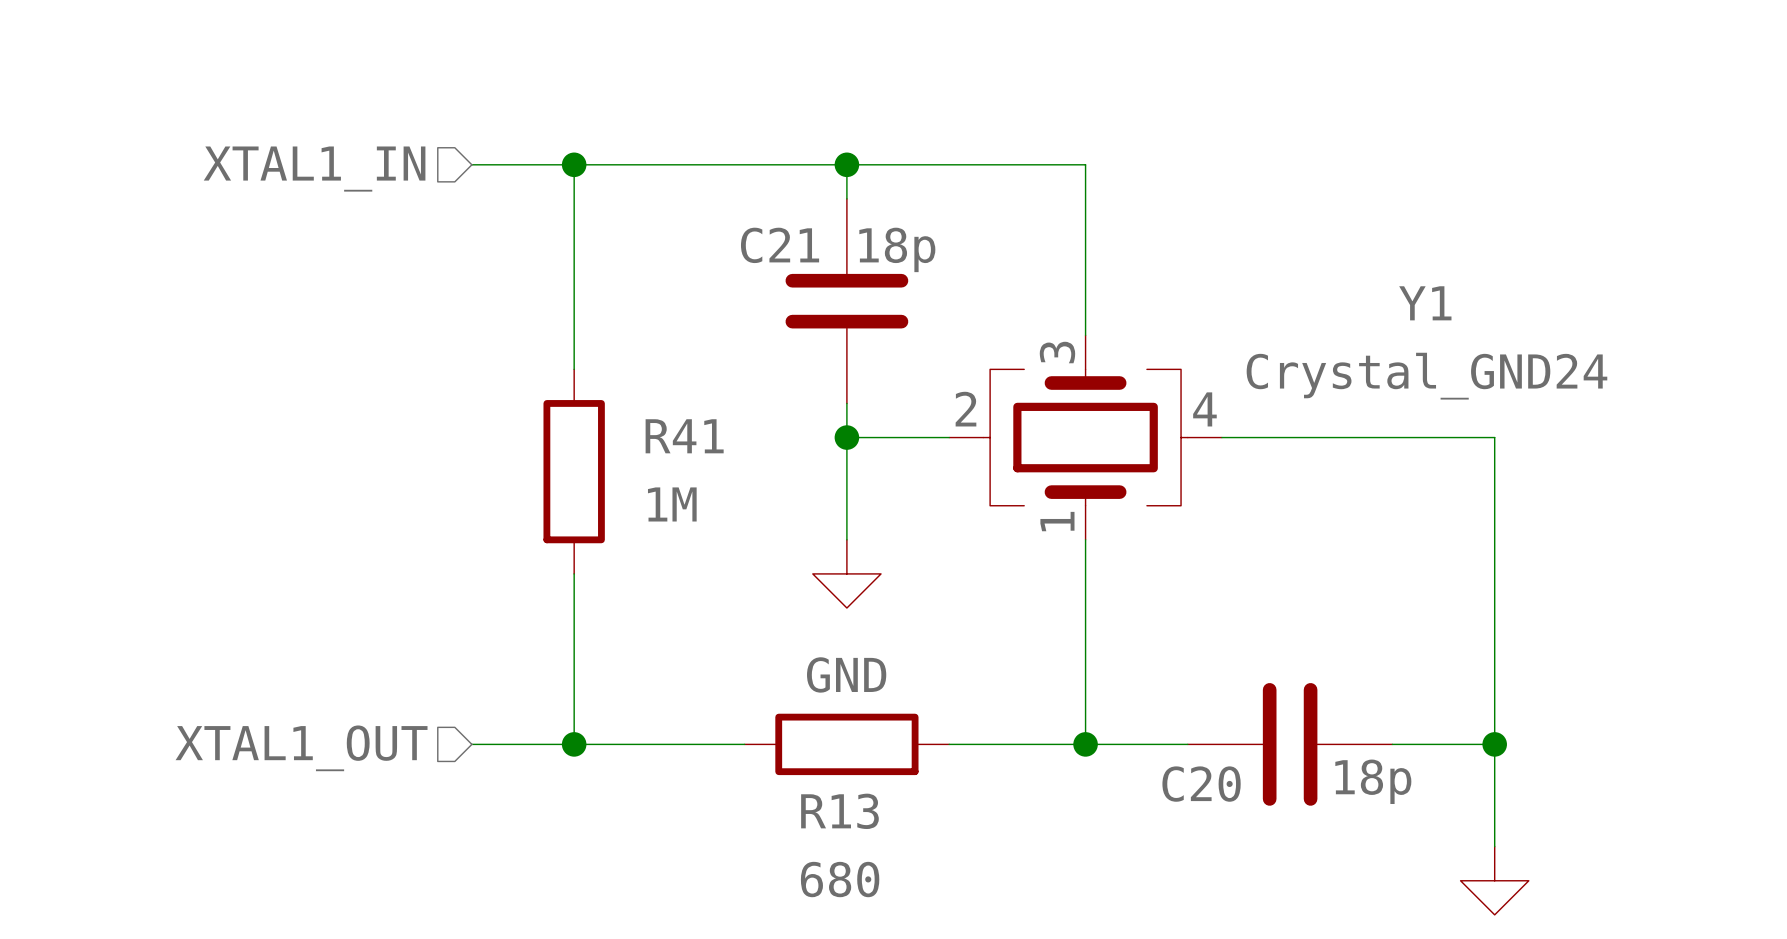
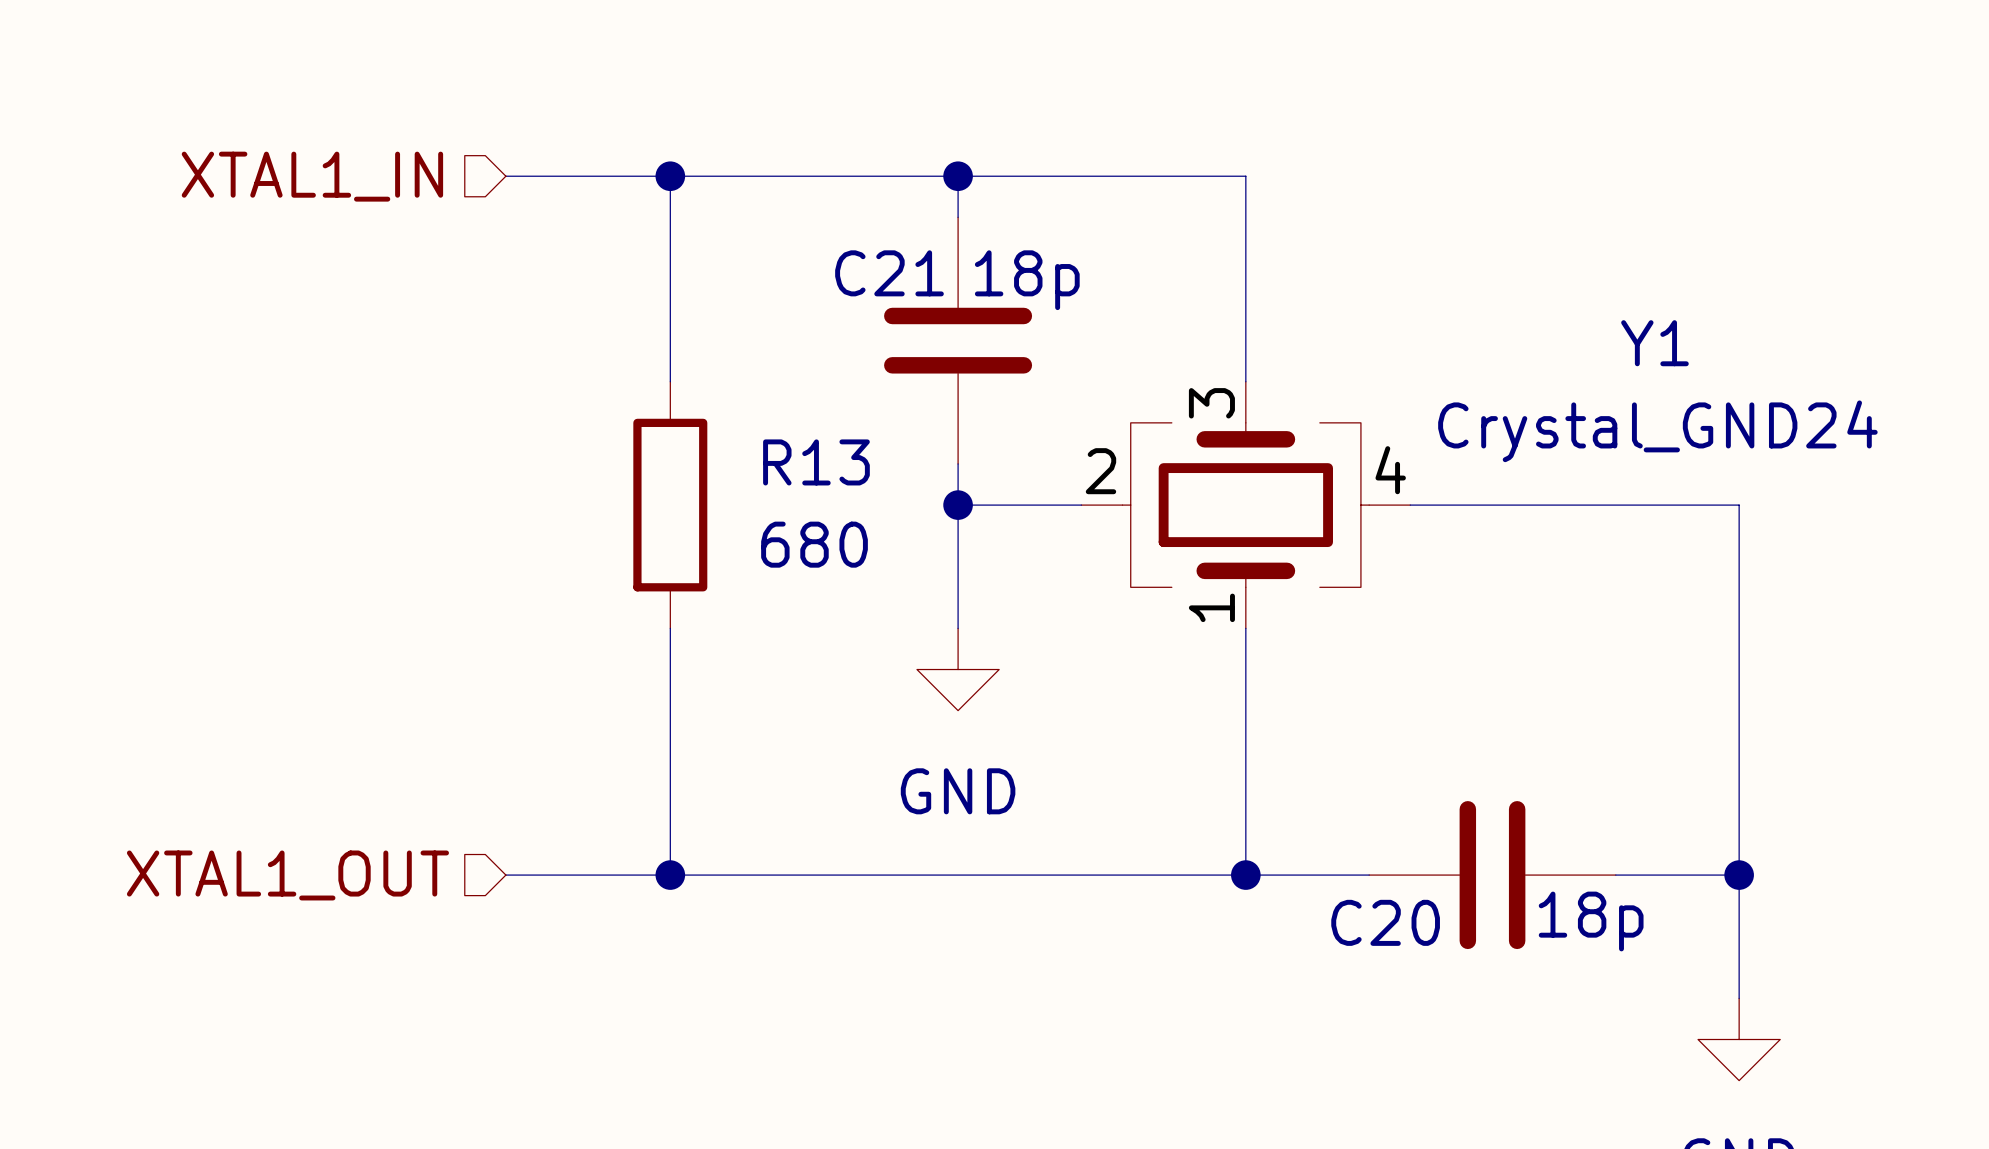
wire: (574, 164) (574, 369) -> (670, 628) (670, 875)
junction position: (574, 164) -> (670, 176)
R41: 1M (574, 471) -> none
wire: (574, 573) (574, 744) -> (670, 176) (670, 381)
junction position: (574, 744) -> (670, 875)
wire: none -> (834, 875) (1081, 875)
R13 rotation: 0° (846, 744) -> 90° clockwise (670, 505)
R13 position: (846, 744) -> (670, 505)
R13 name position: R13 (839, 811) -> R13 (816, 462)
R13 value position: 680 (840, 879) -> 680 (814, 544)

